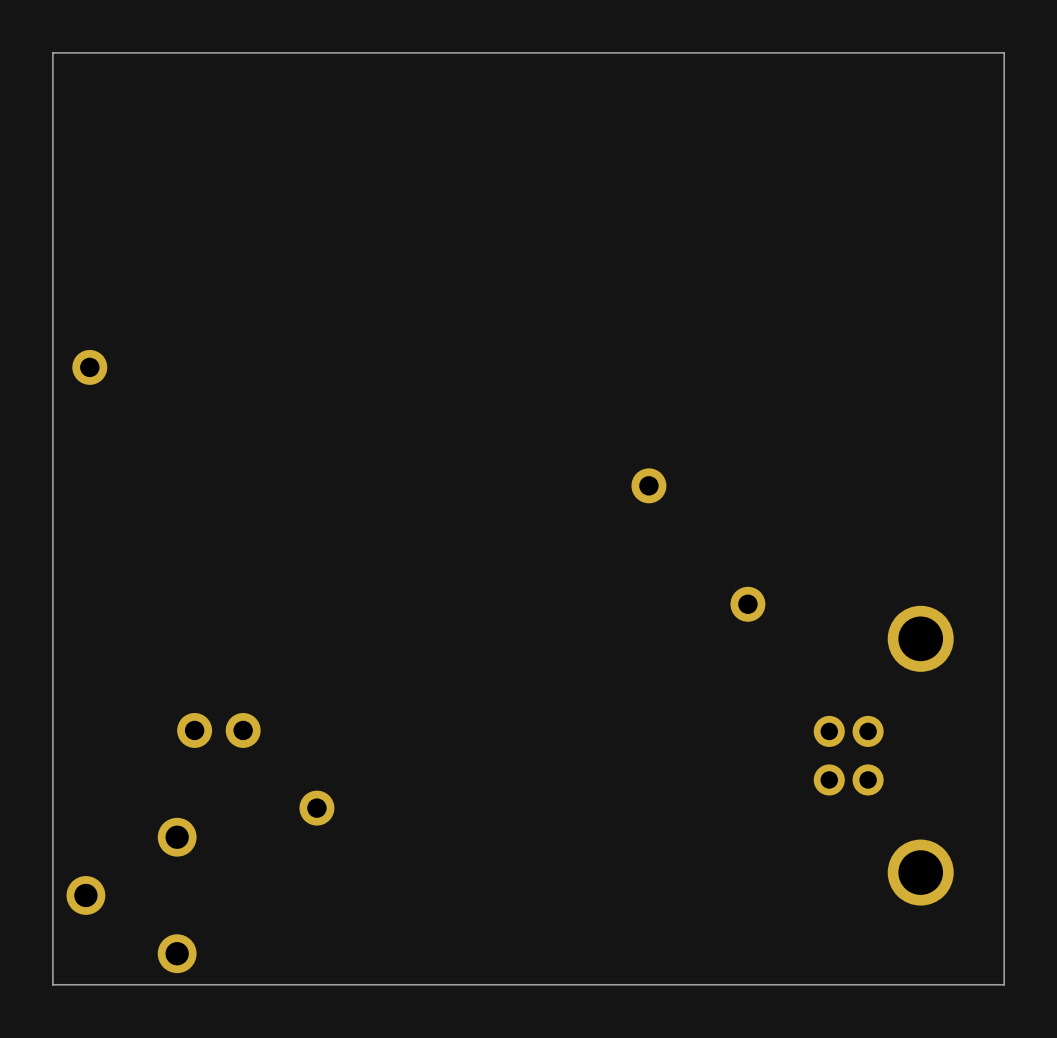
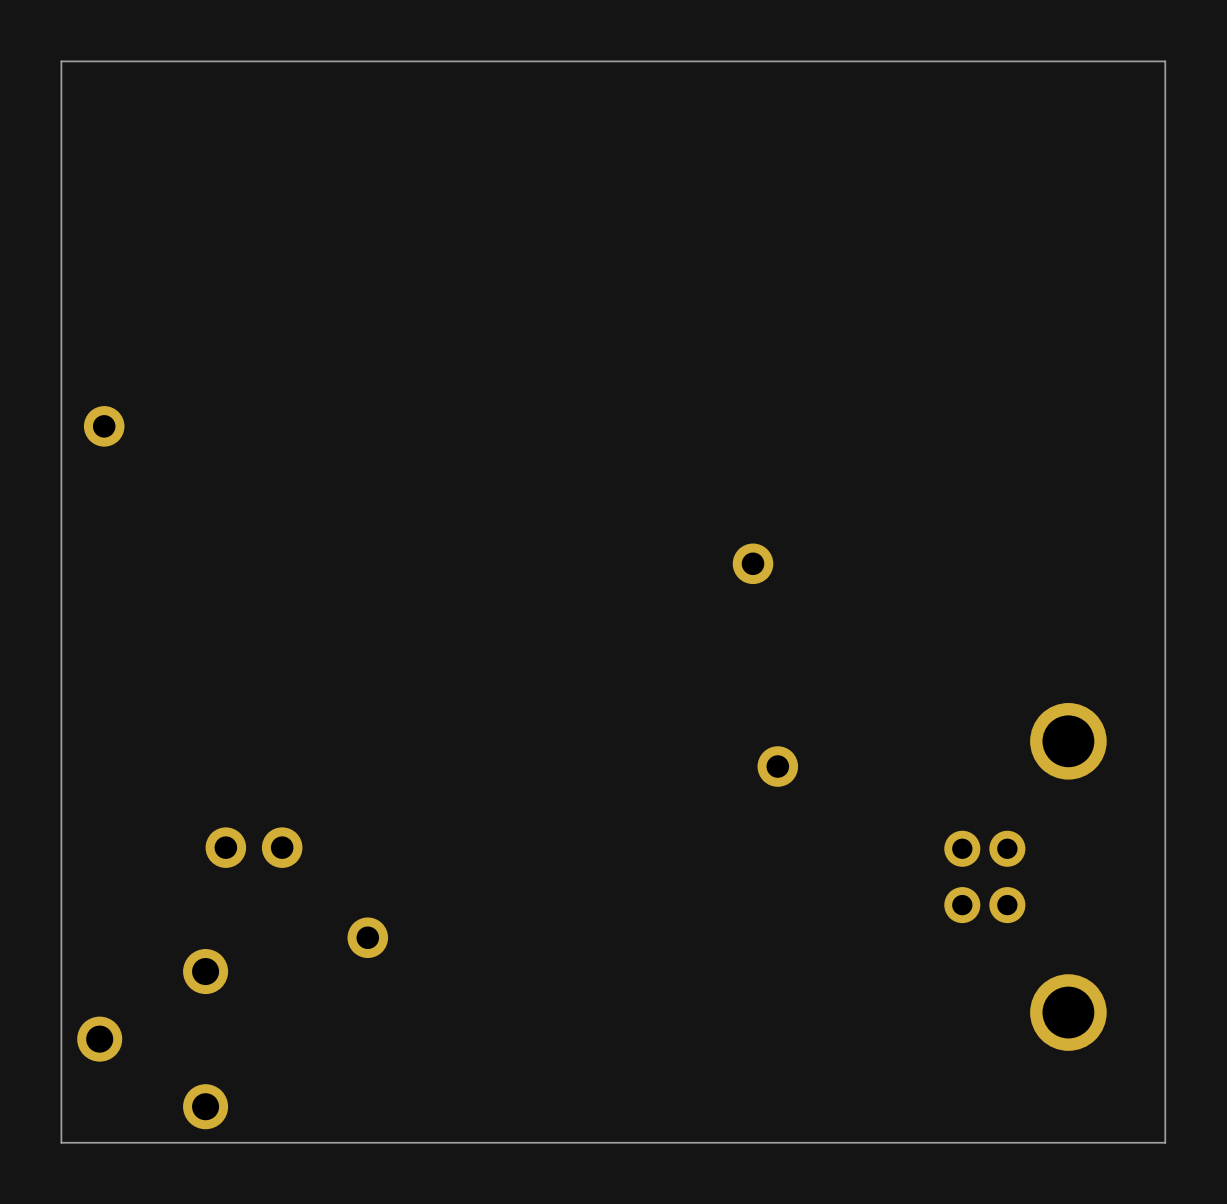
part position: (747, 604) -> (777, 766)

